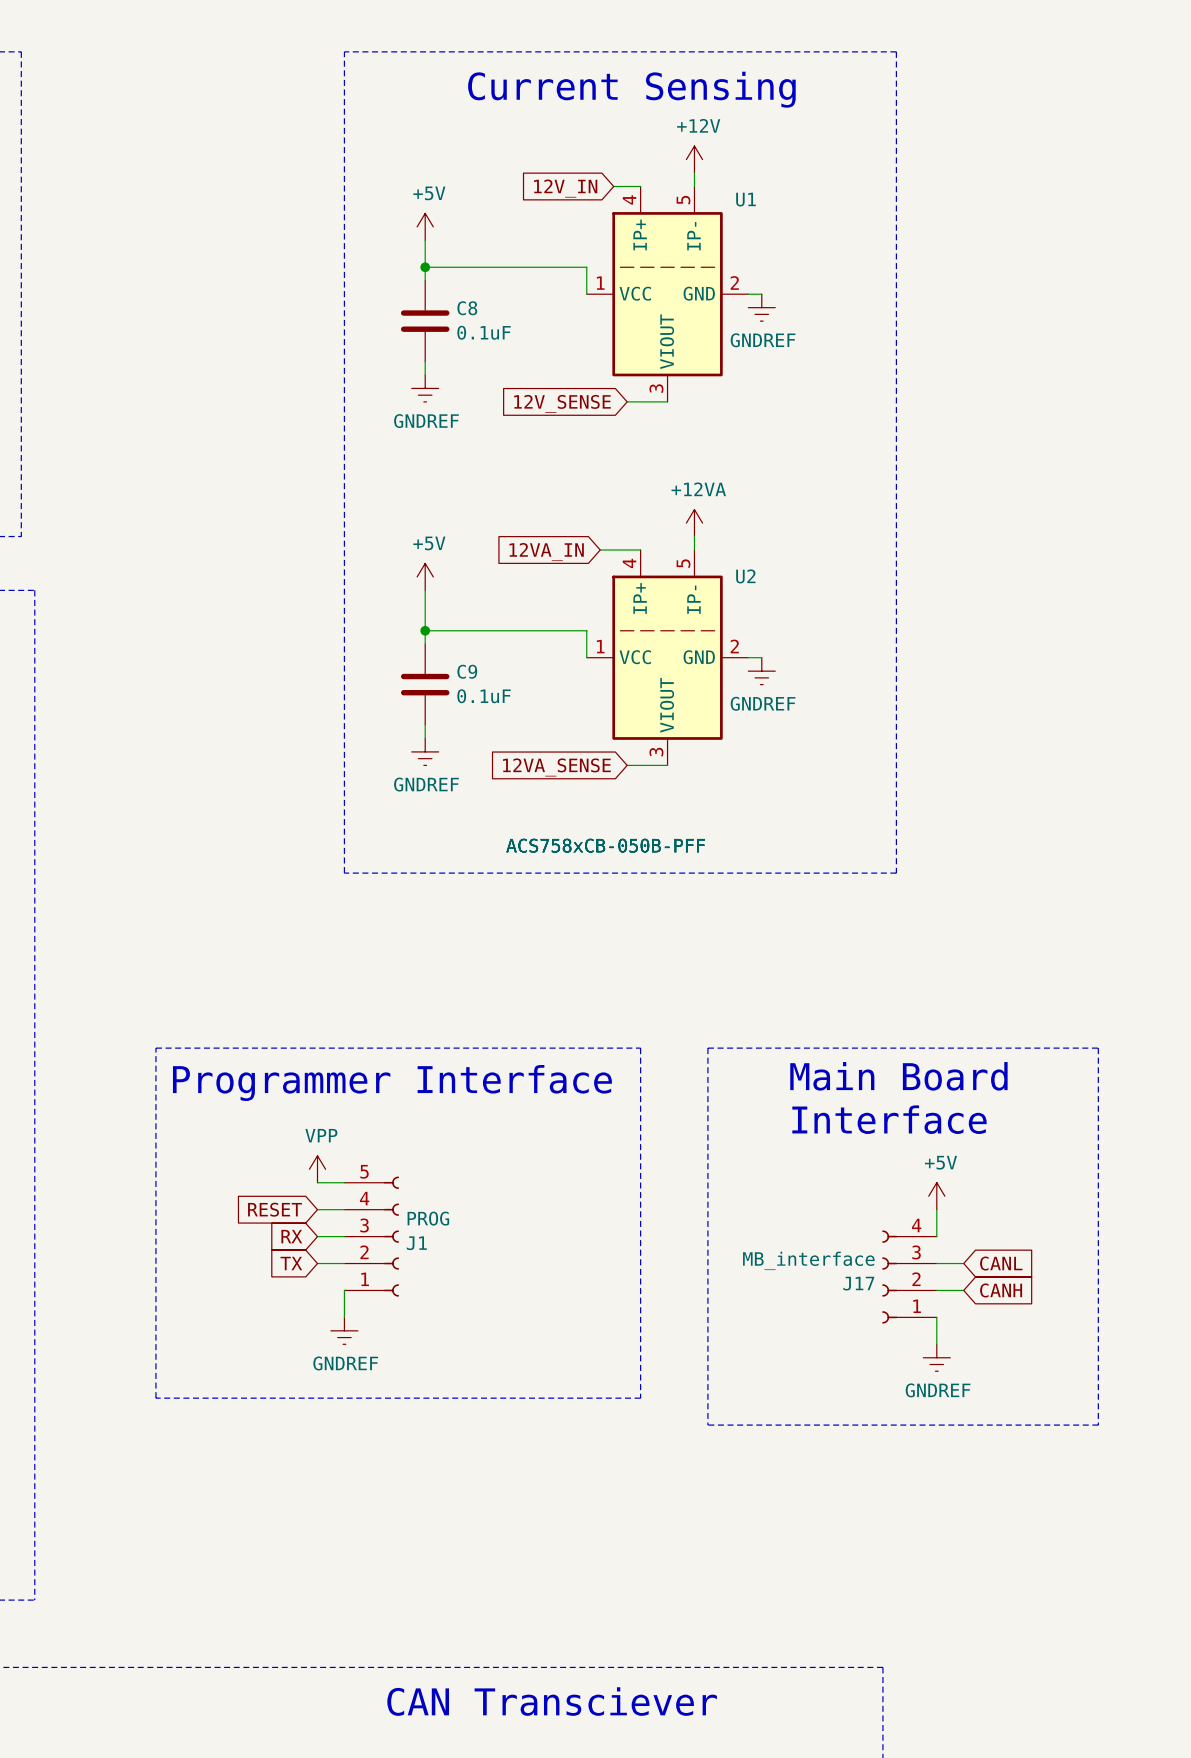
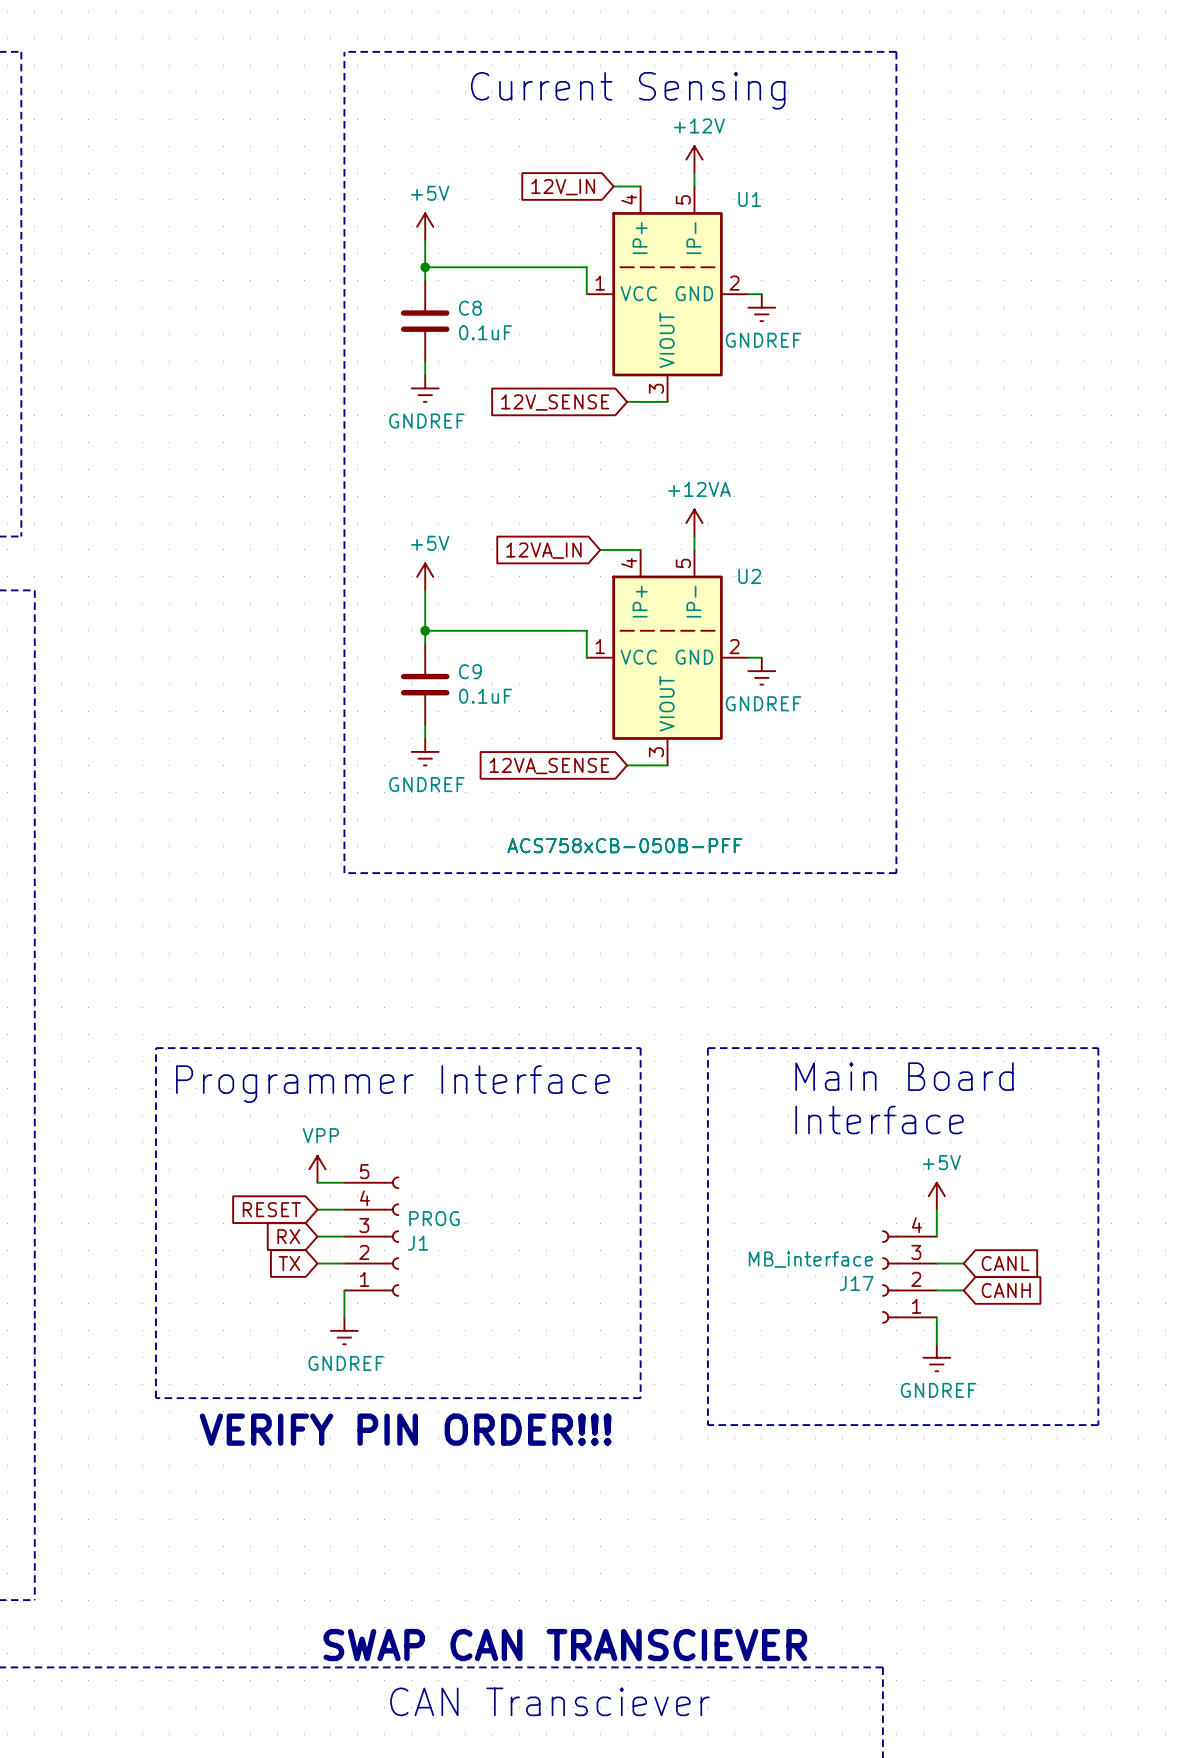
text: none -> VERIFY PIN ORDER!!! (405, 1429)
text: none -> SWAP CAN TRANSCIEVER (565, 1645)

